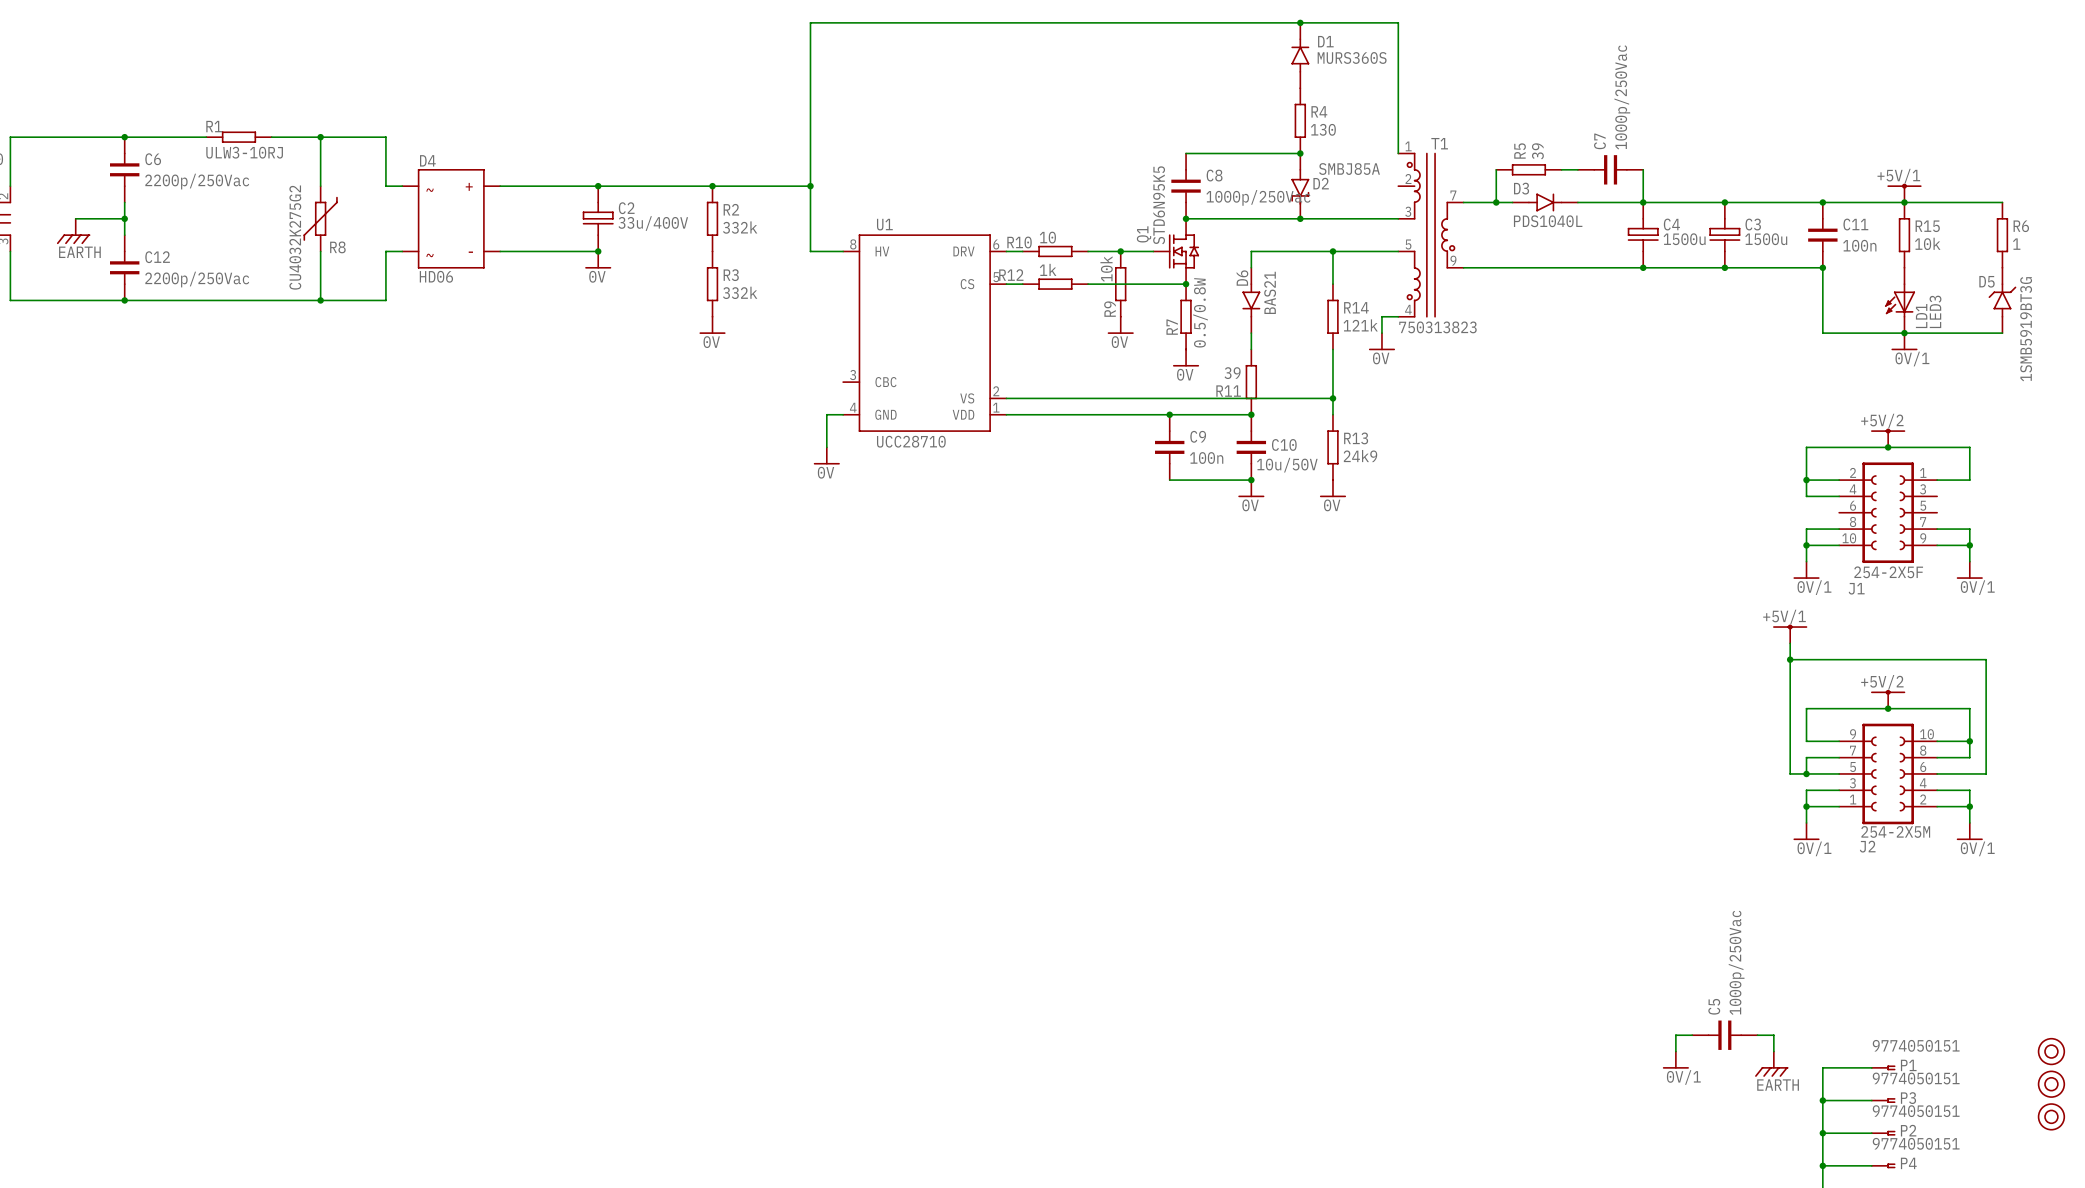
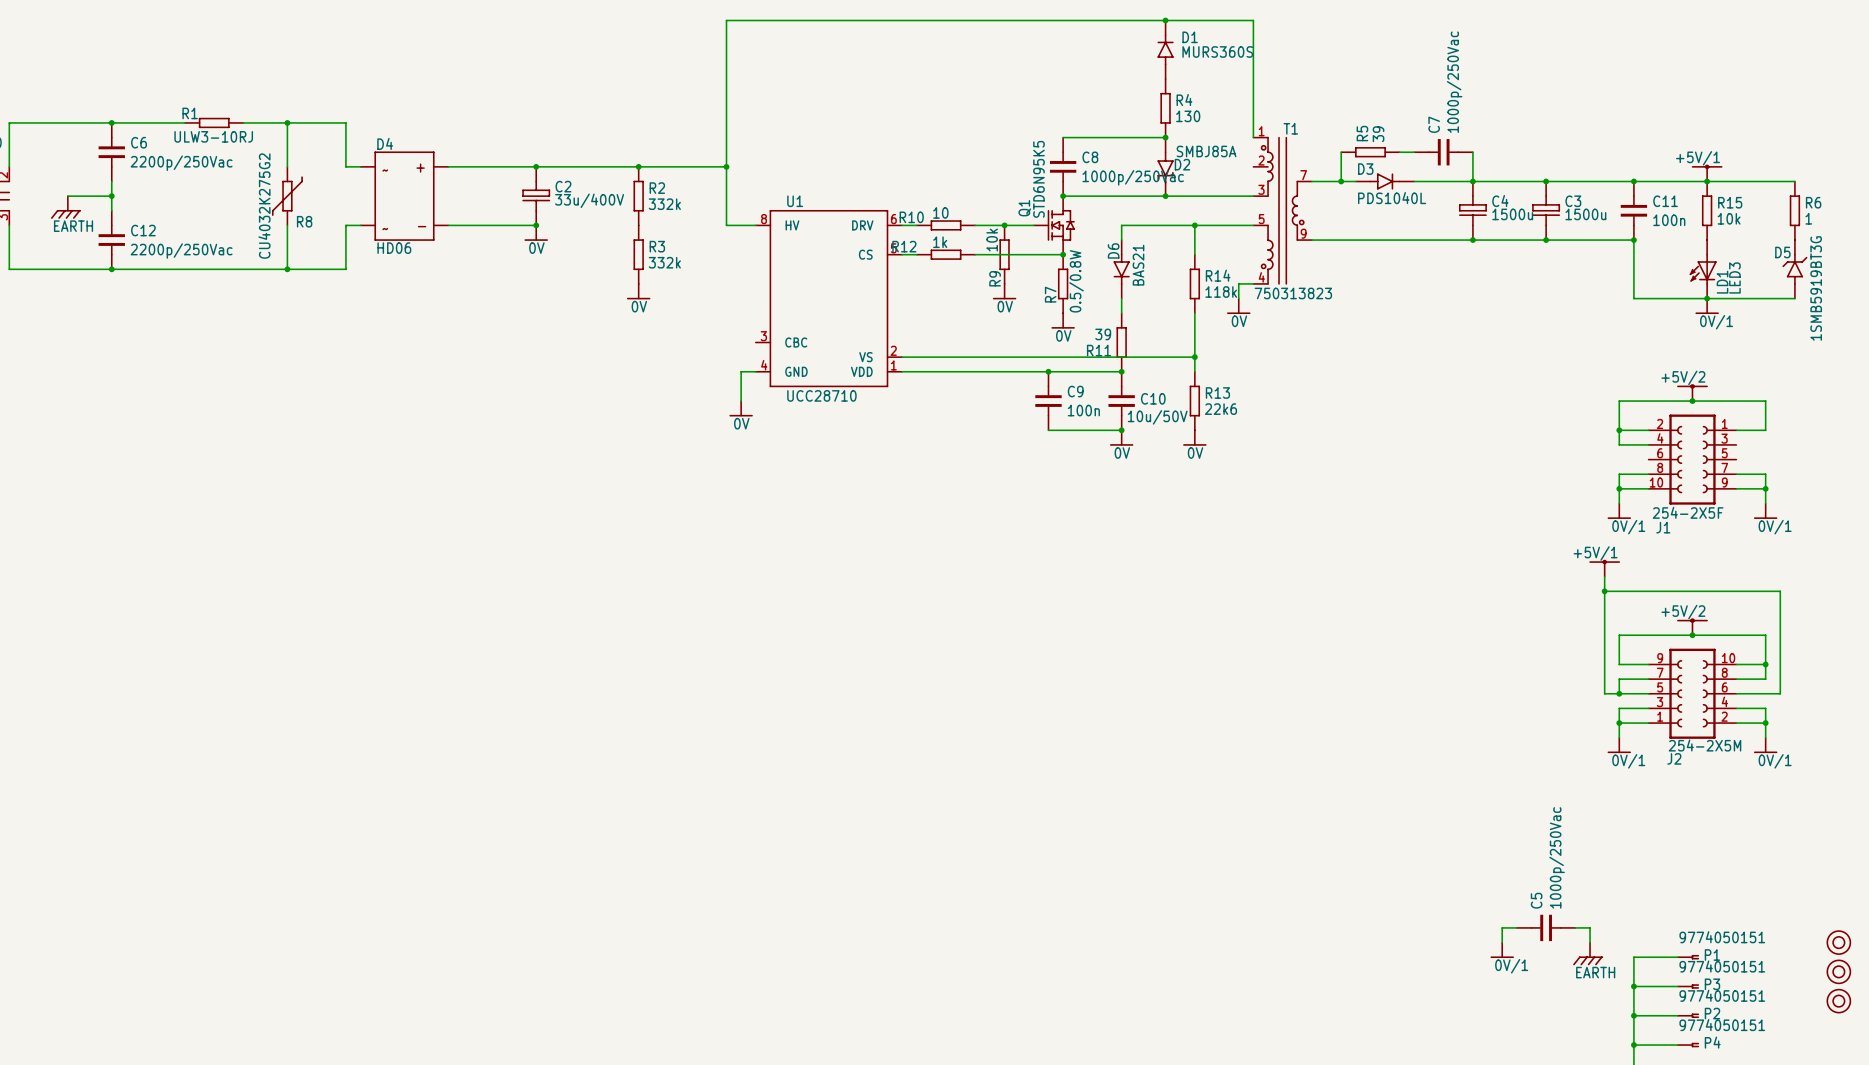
R14 value: 121k (1360, 325) -> 118k (1221, 292)
R13 value: 24k9 (1360, 456) -> 22k6 (1220, 409)

